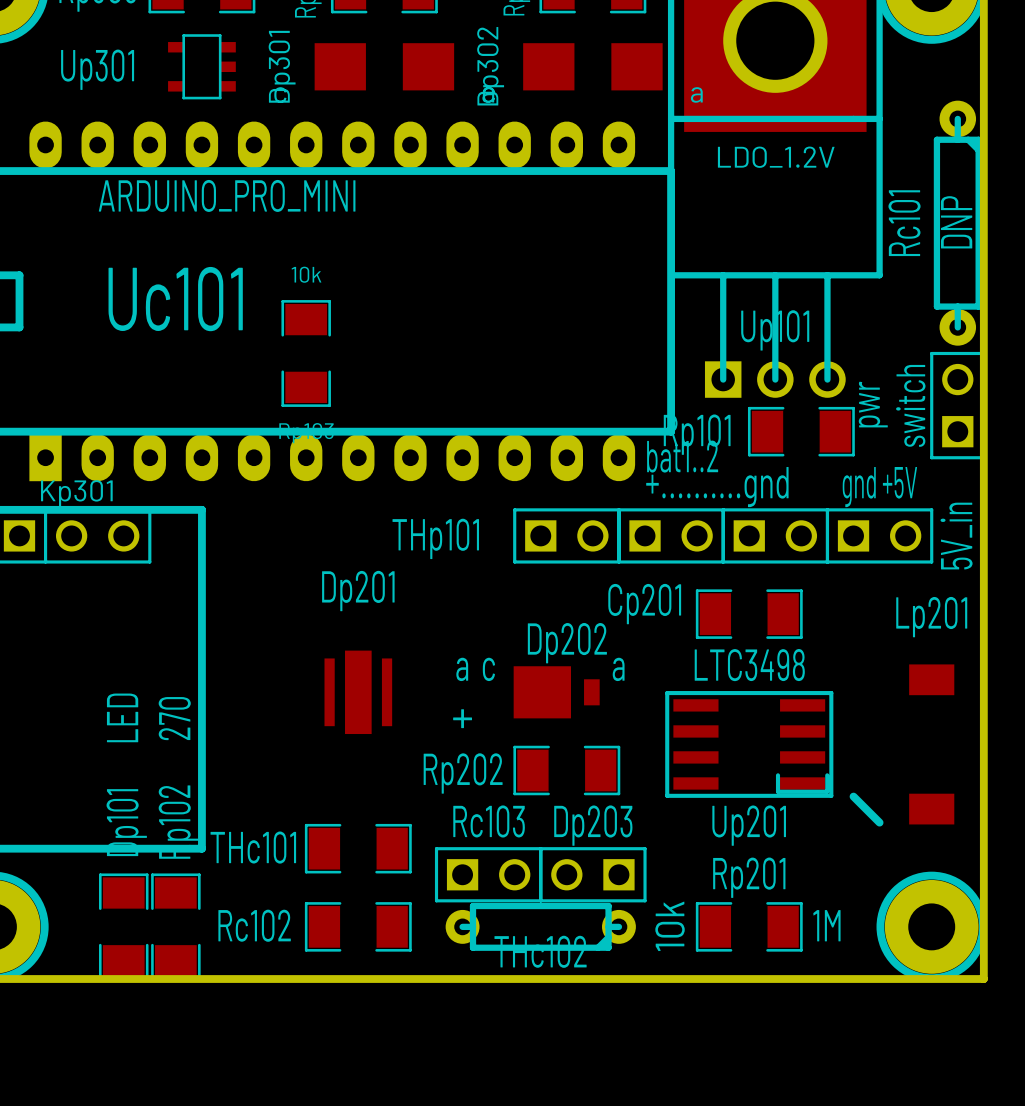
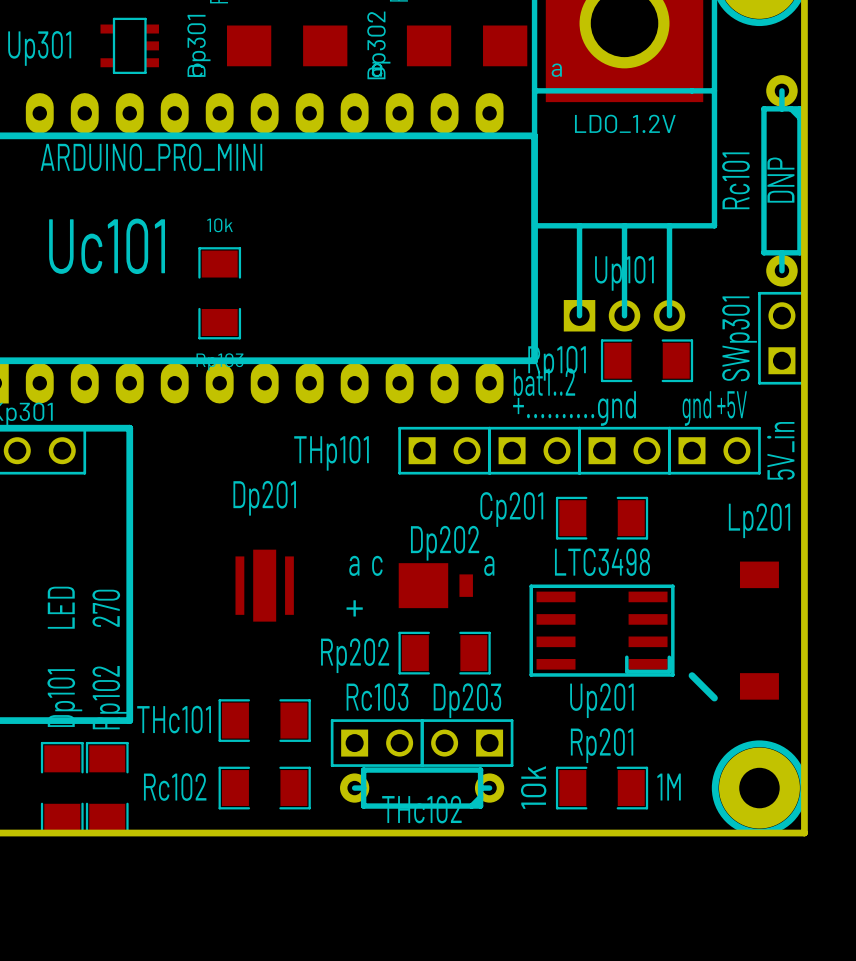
text: pwr (873, 404) -> none
text: switch (910, 405) -> none
SWp301 name: none -> SWp301 (739, 338)

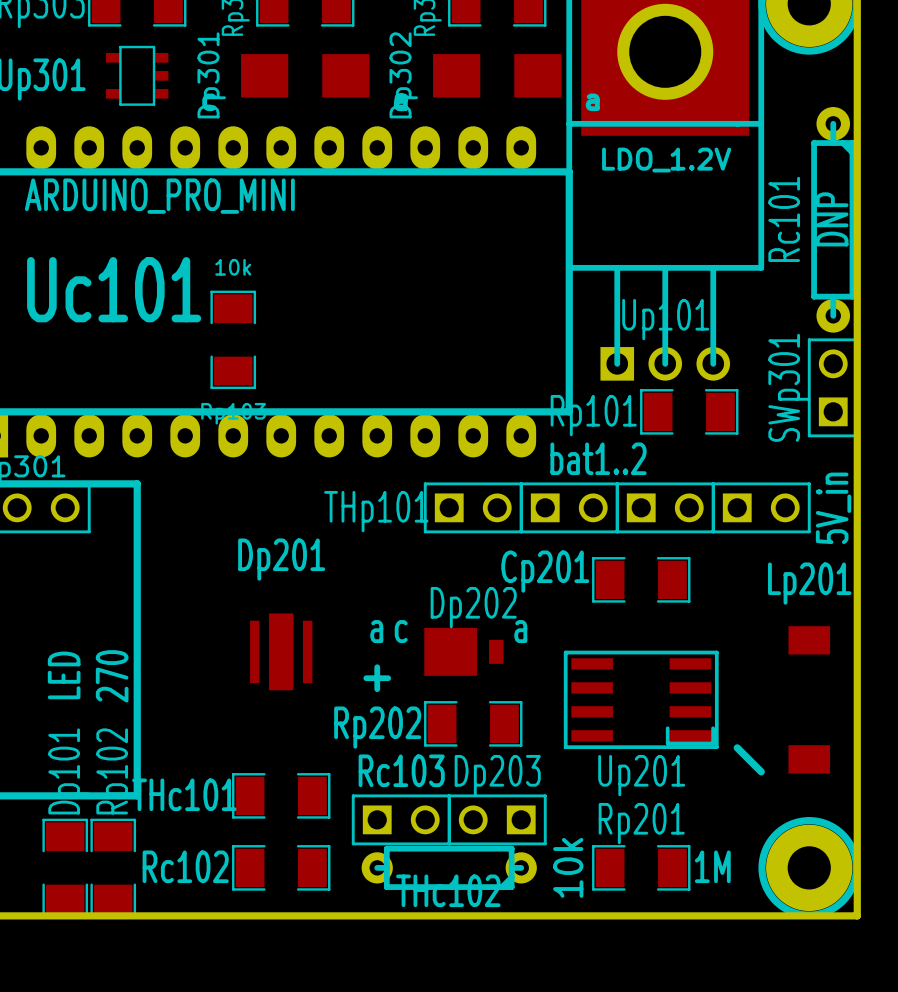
text: bat1..2 (544, 382) -> none
text: +..........gnd (574, 408) -> bat1..2 (598, 458)
text: gnd +5V (714, 408) -> none
THp101 name position: THp101 (331, 453) -> THp101 (376, 511)
text: LTC3498 (602, 562) -> none

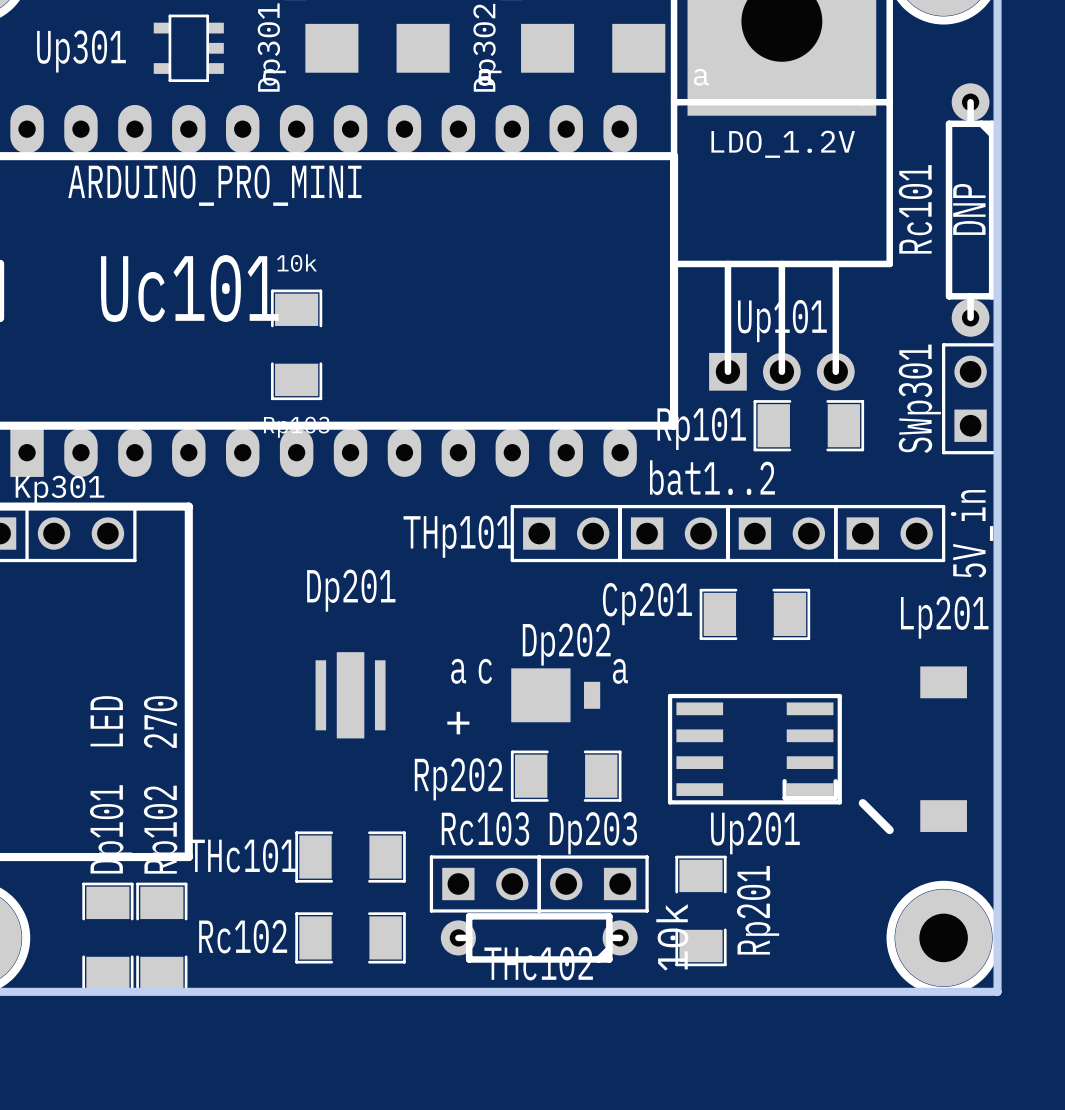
Uc101 name position: Uc101 (114, 289) -> Uc101 (189, 288)
Rp201 value: 1M (712, 866) -> none
Rp201 rotation: 0° (641, 867) -> 90° clockwise (701, 910)

